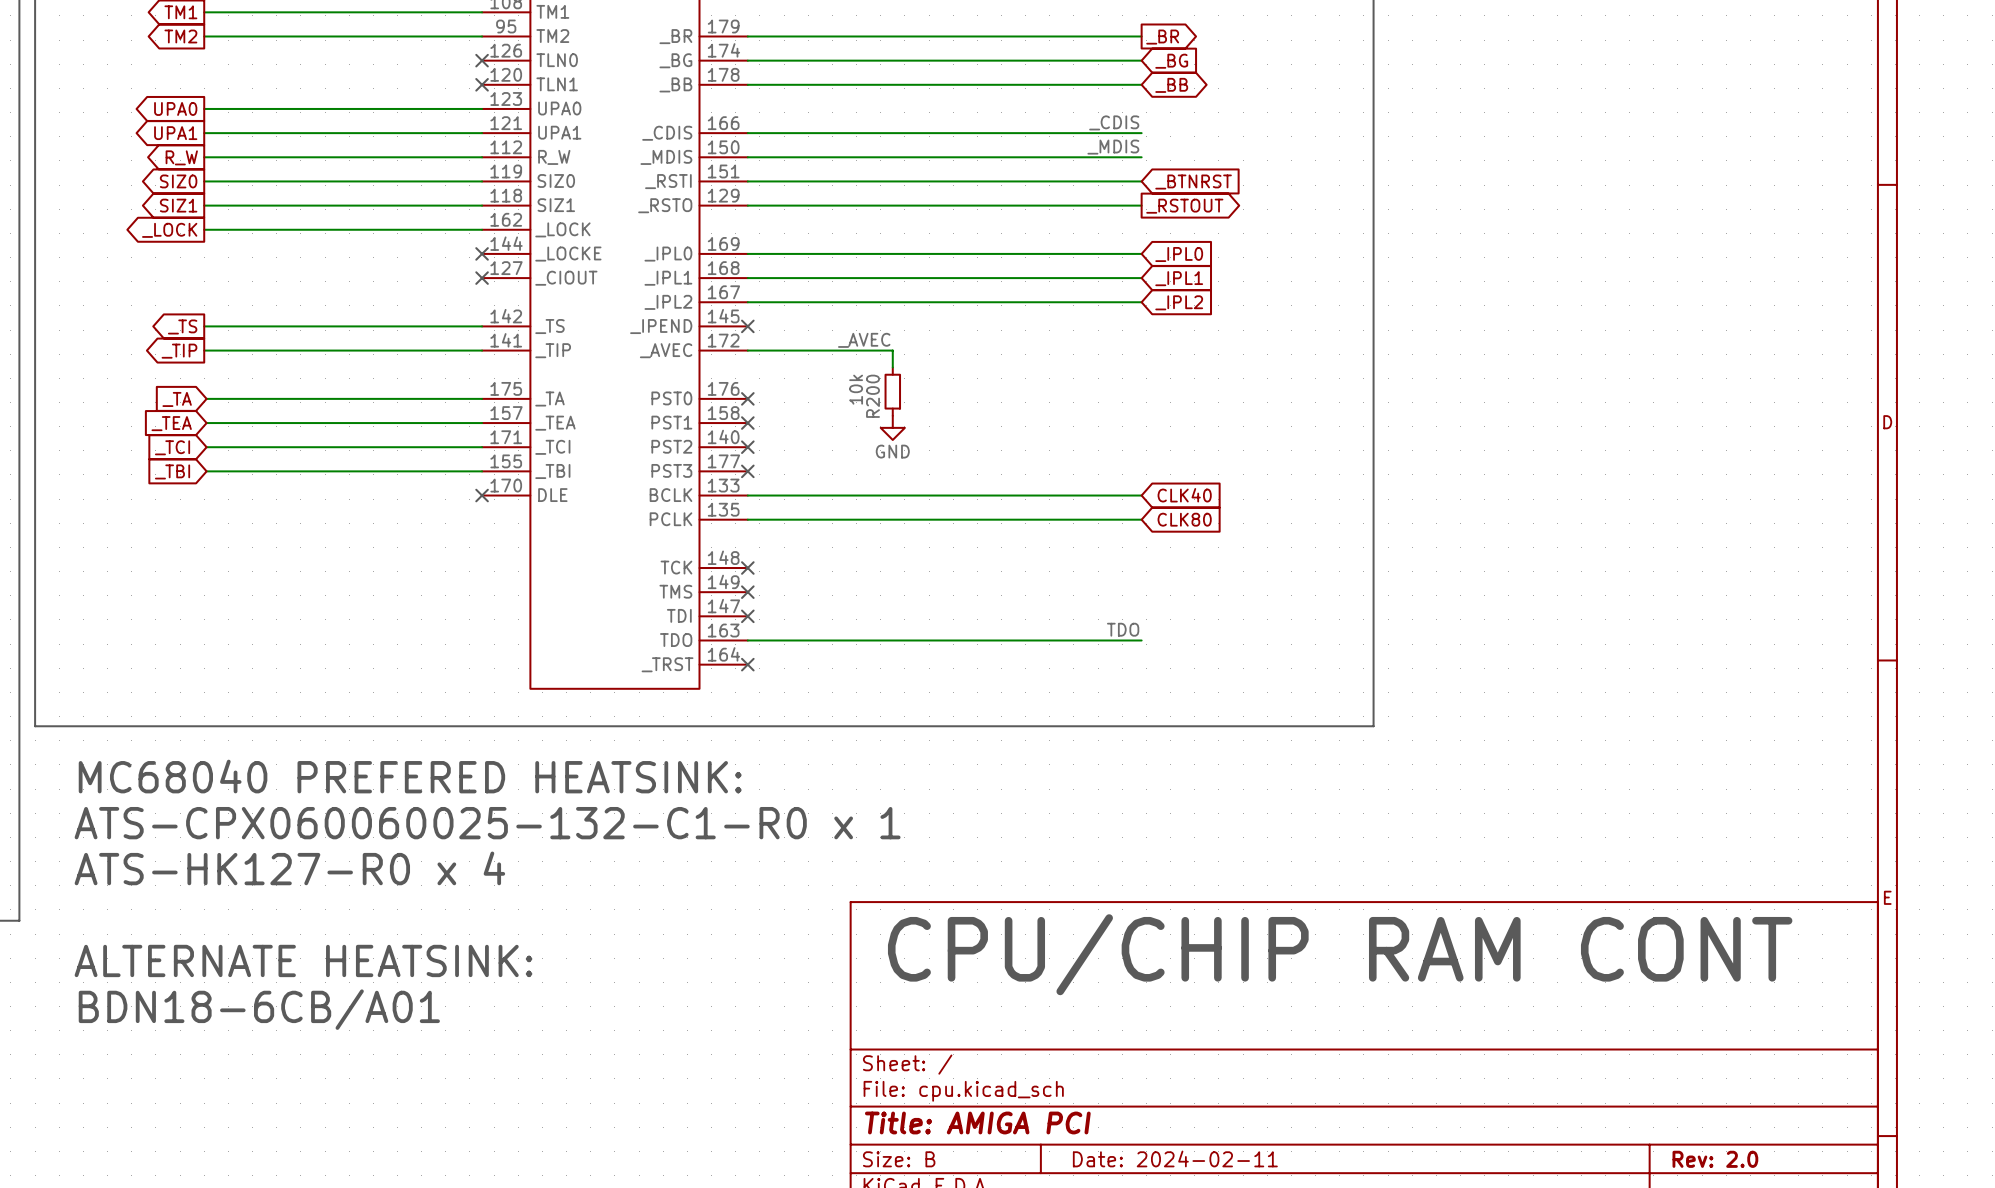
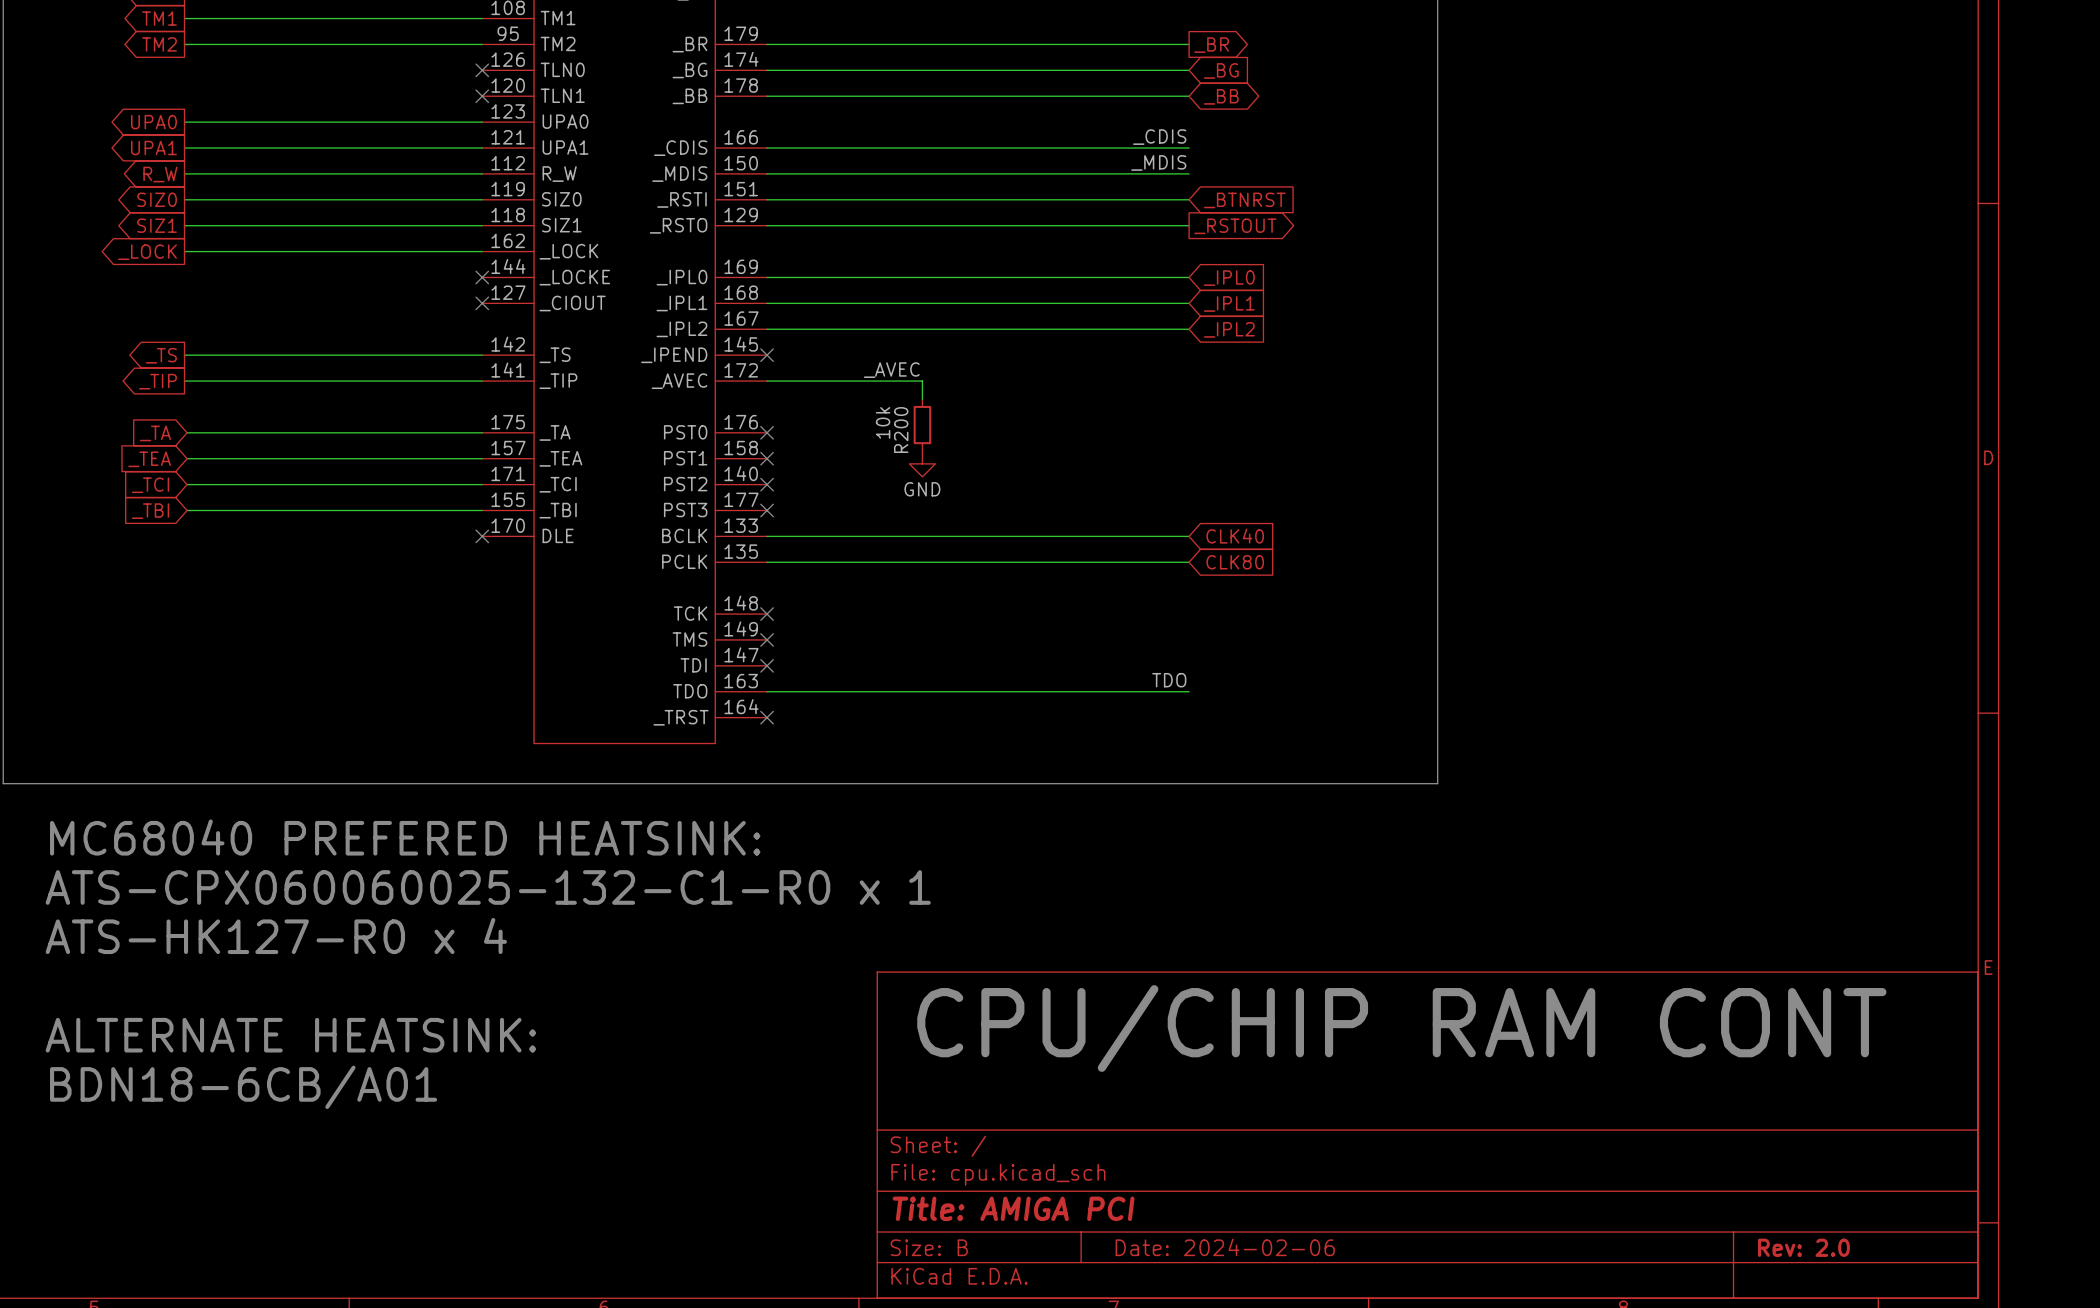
title block: Date: 2024-02-11 (1175, 1158) -> Date: 2024-02-06 (1225, 1247)

